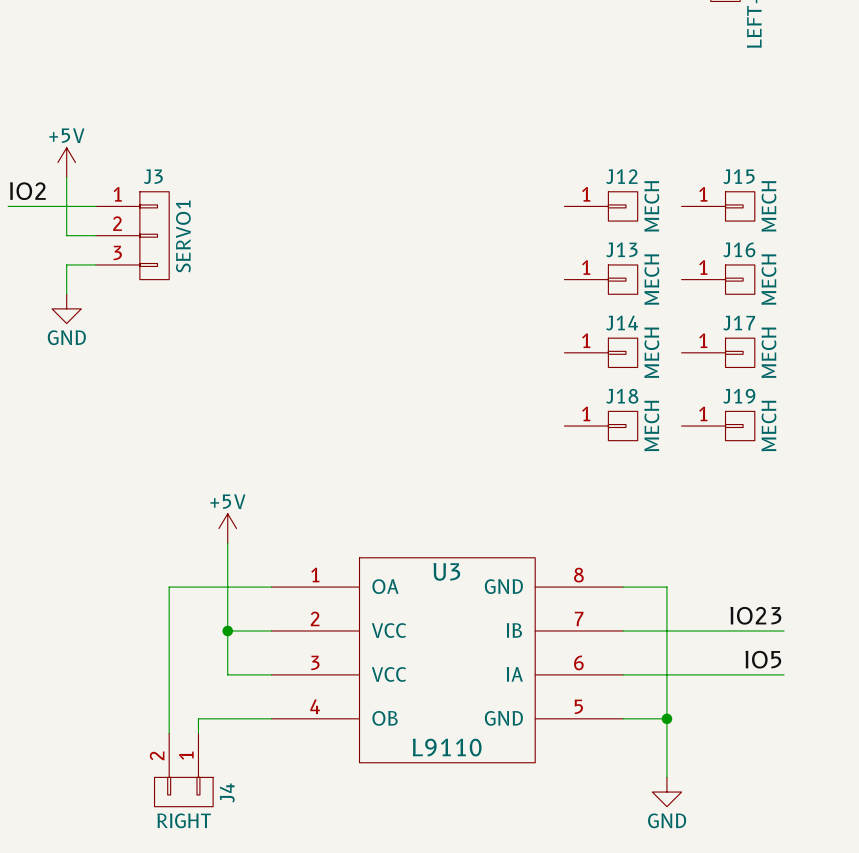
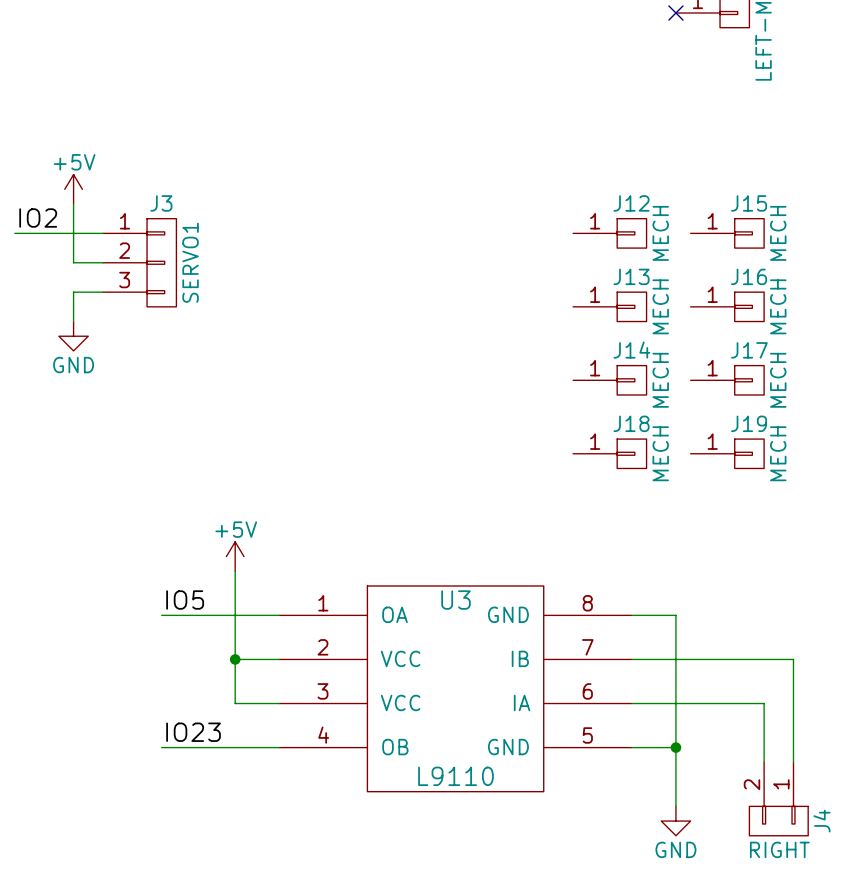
label: none -> IO5 (185, 599)
wire: (169, 587) (169, 733) -> (176, 615) (161, 615)
label: IO23 (755, 615) -> none
wire: none -> (793, 659) (793, 762)
label: IO5 (763, 659) -> none
wire: (754, 674) (784, 674) -> (764, 703) (764, 762)
label: none -> IO23 (193, 732)
wire: (198, 718) (198, 733) -> (205, 747) (161, 747)
J4 position: (183, 770) -> (778, 799)

